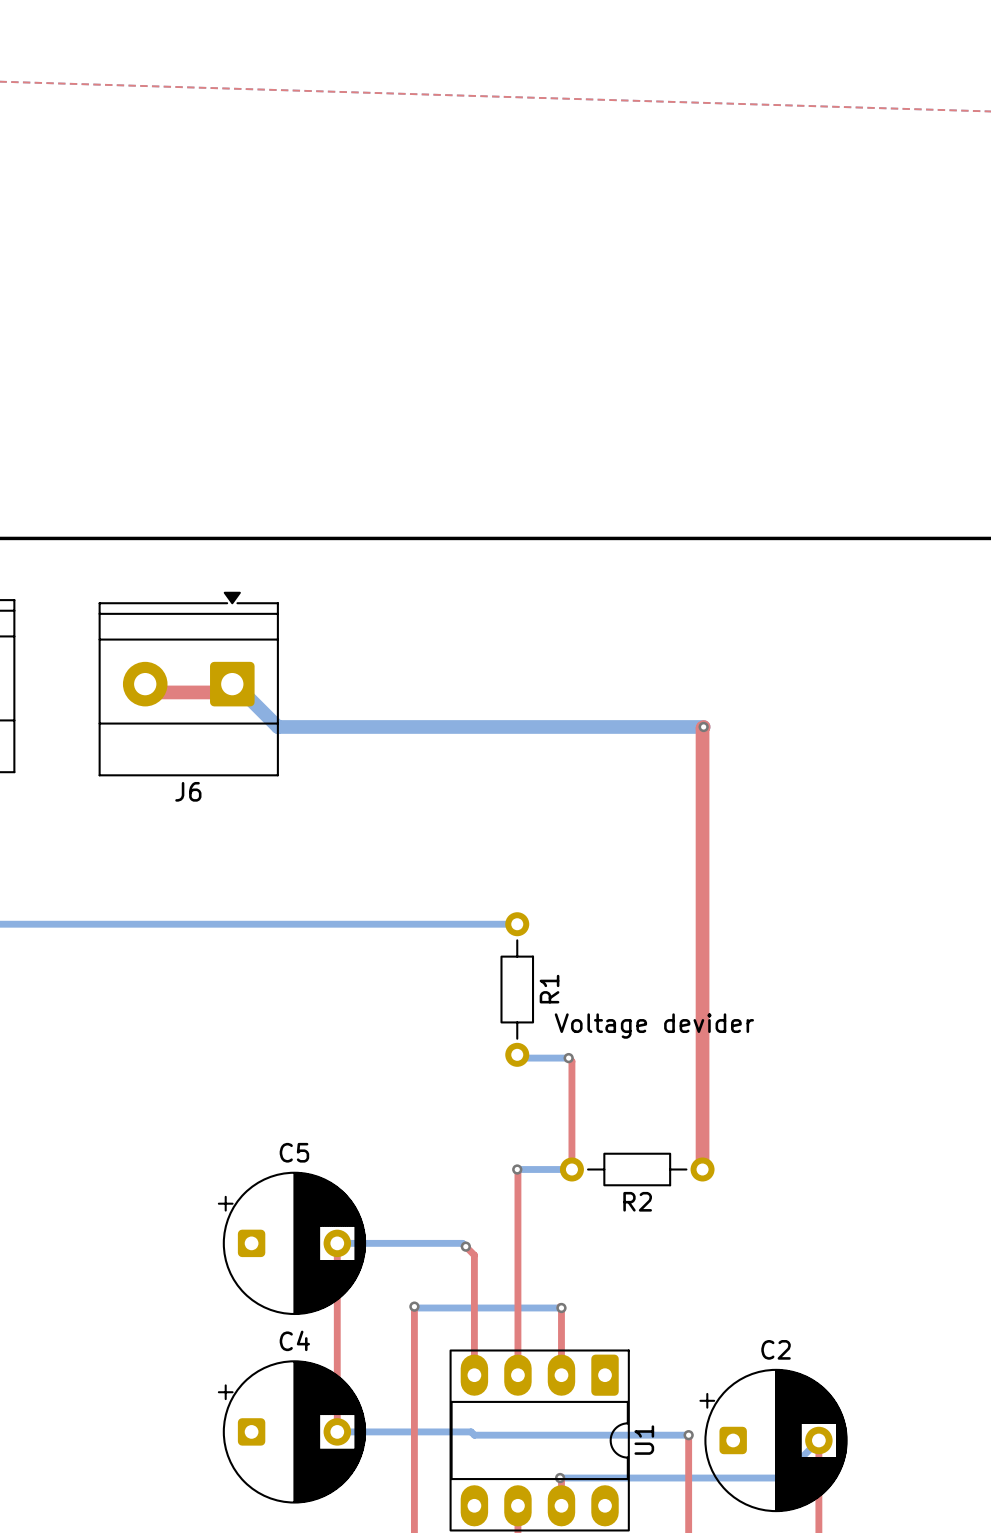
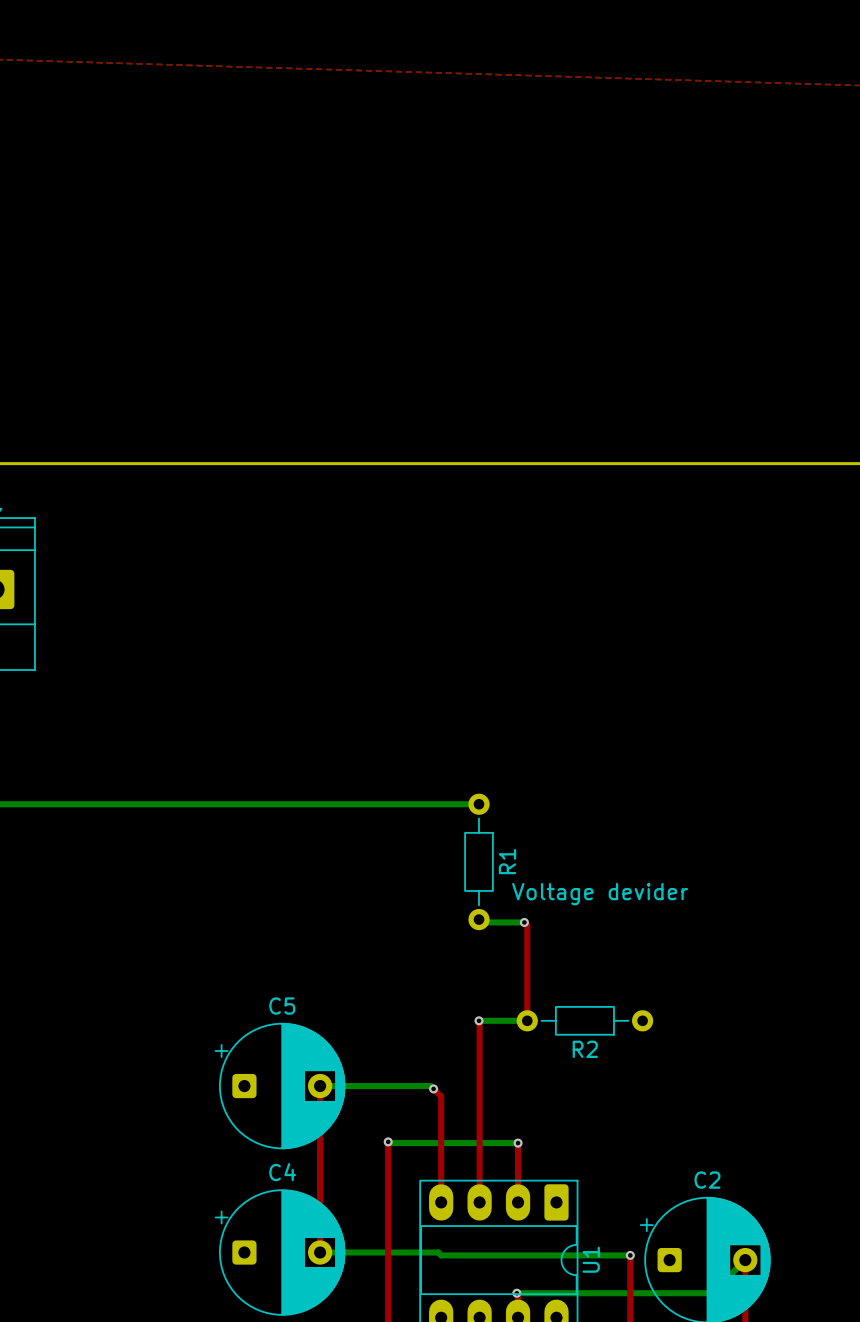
J6: (188, 684) -> none
top track: (156, 692) (243, 692) -> none
bottom track: (243, 692) (277, 726) (703, 726) -> none
top track: (703, 726) (702, 1169) -> none
via: (703, 726) -> none

